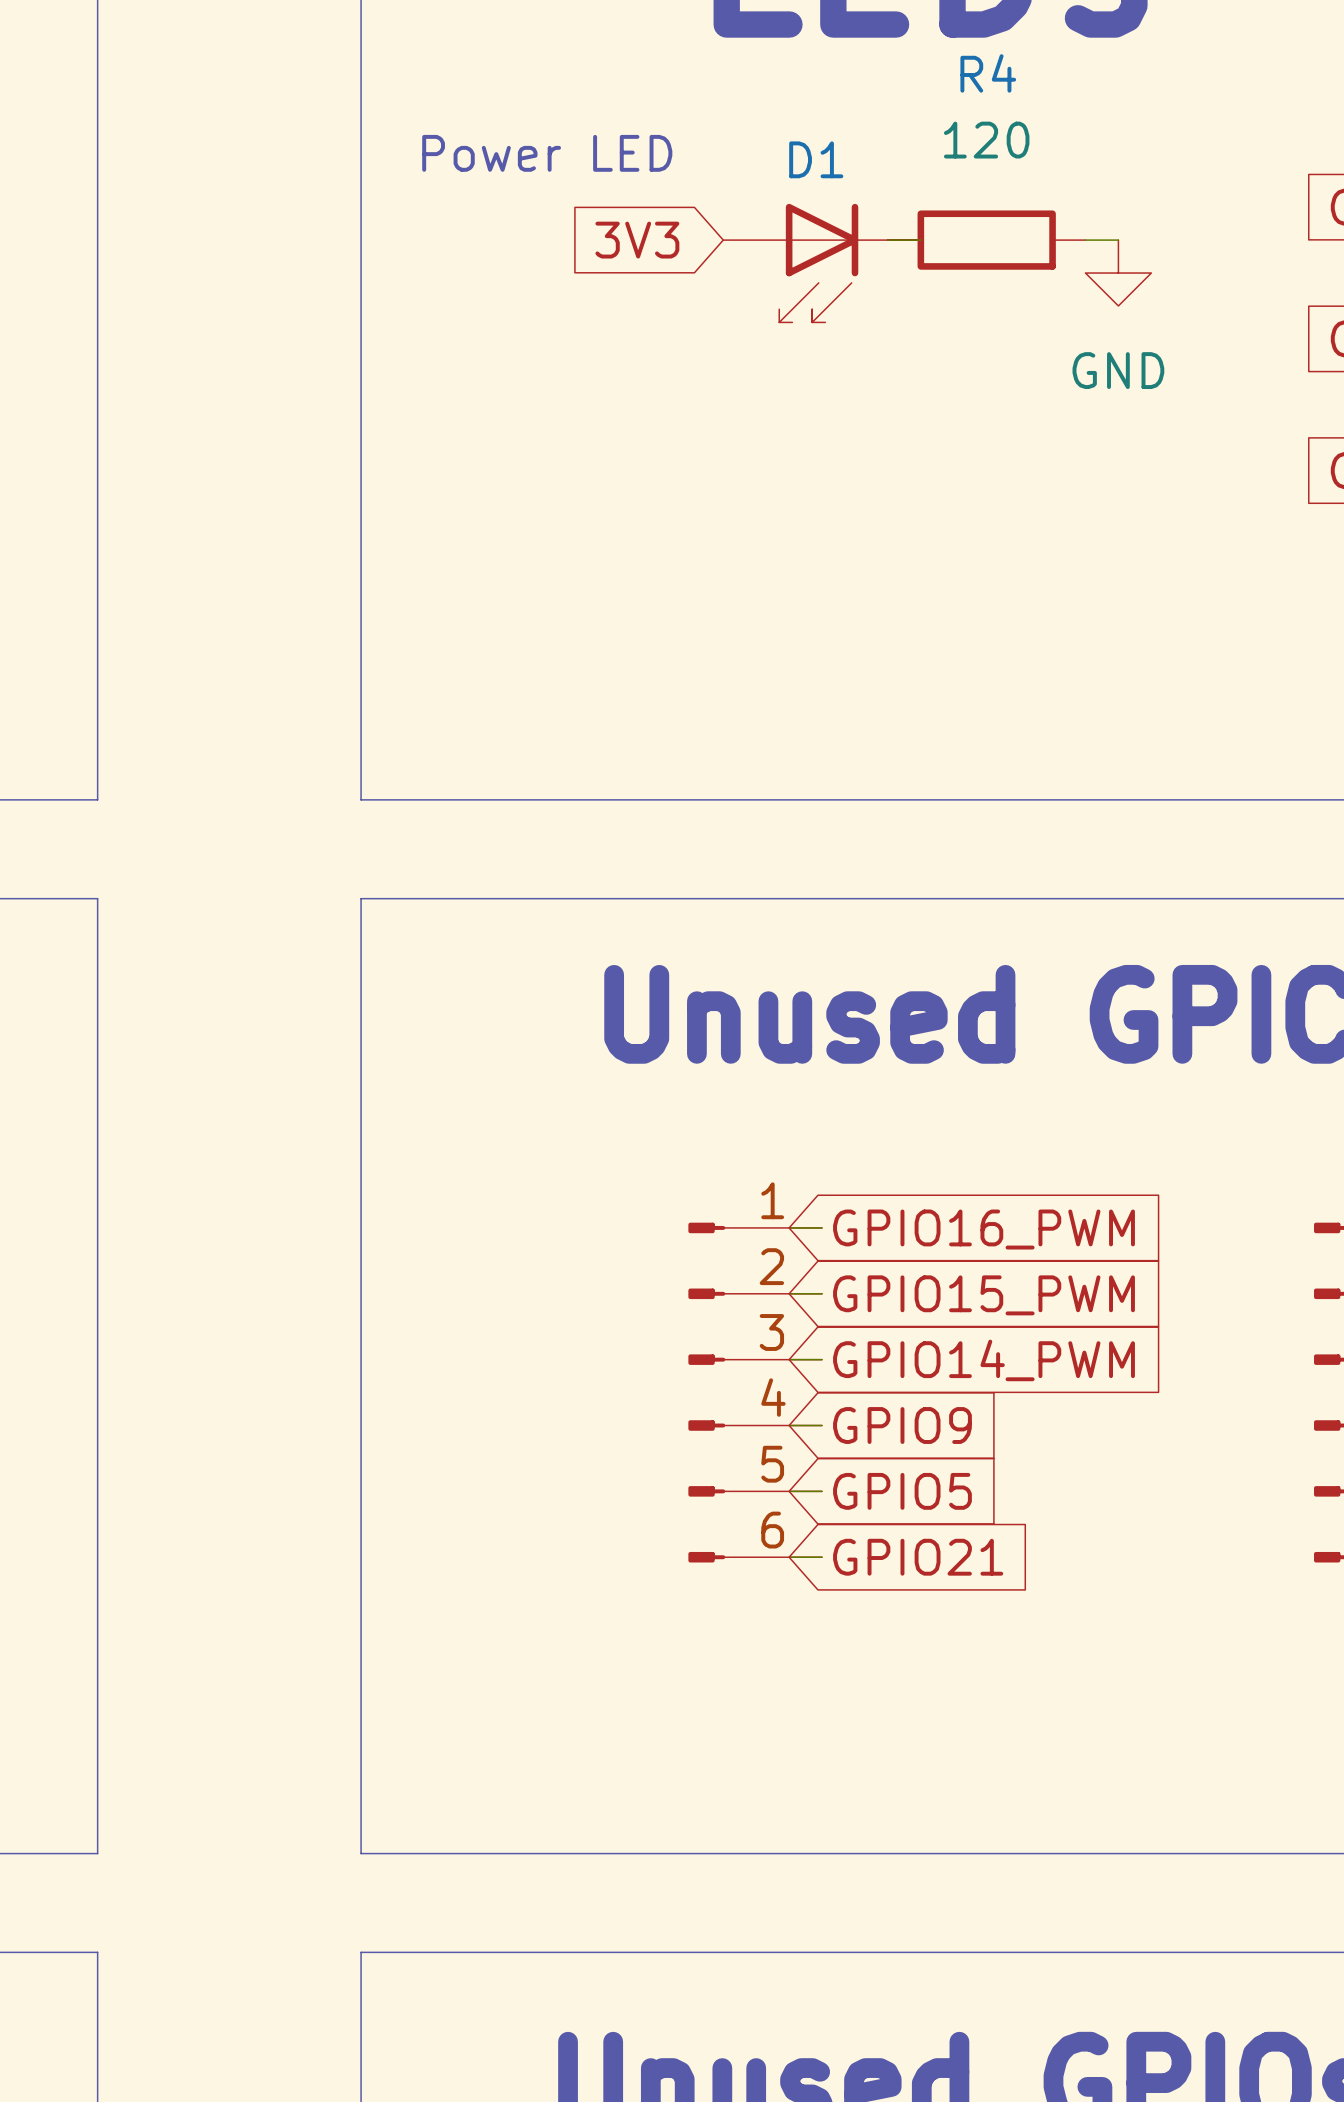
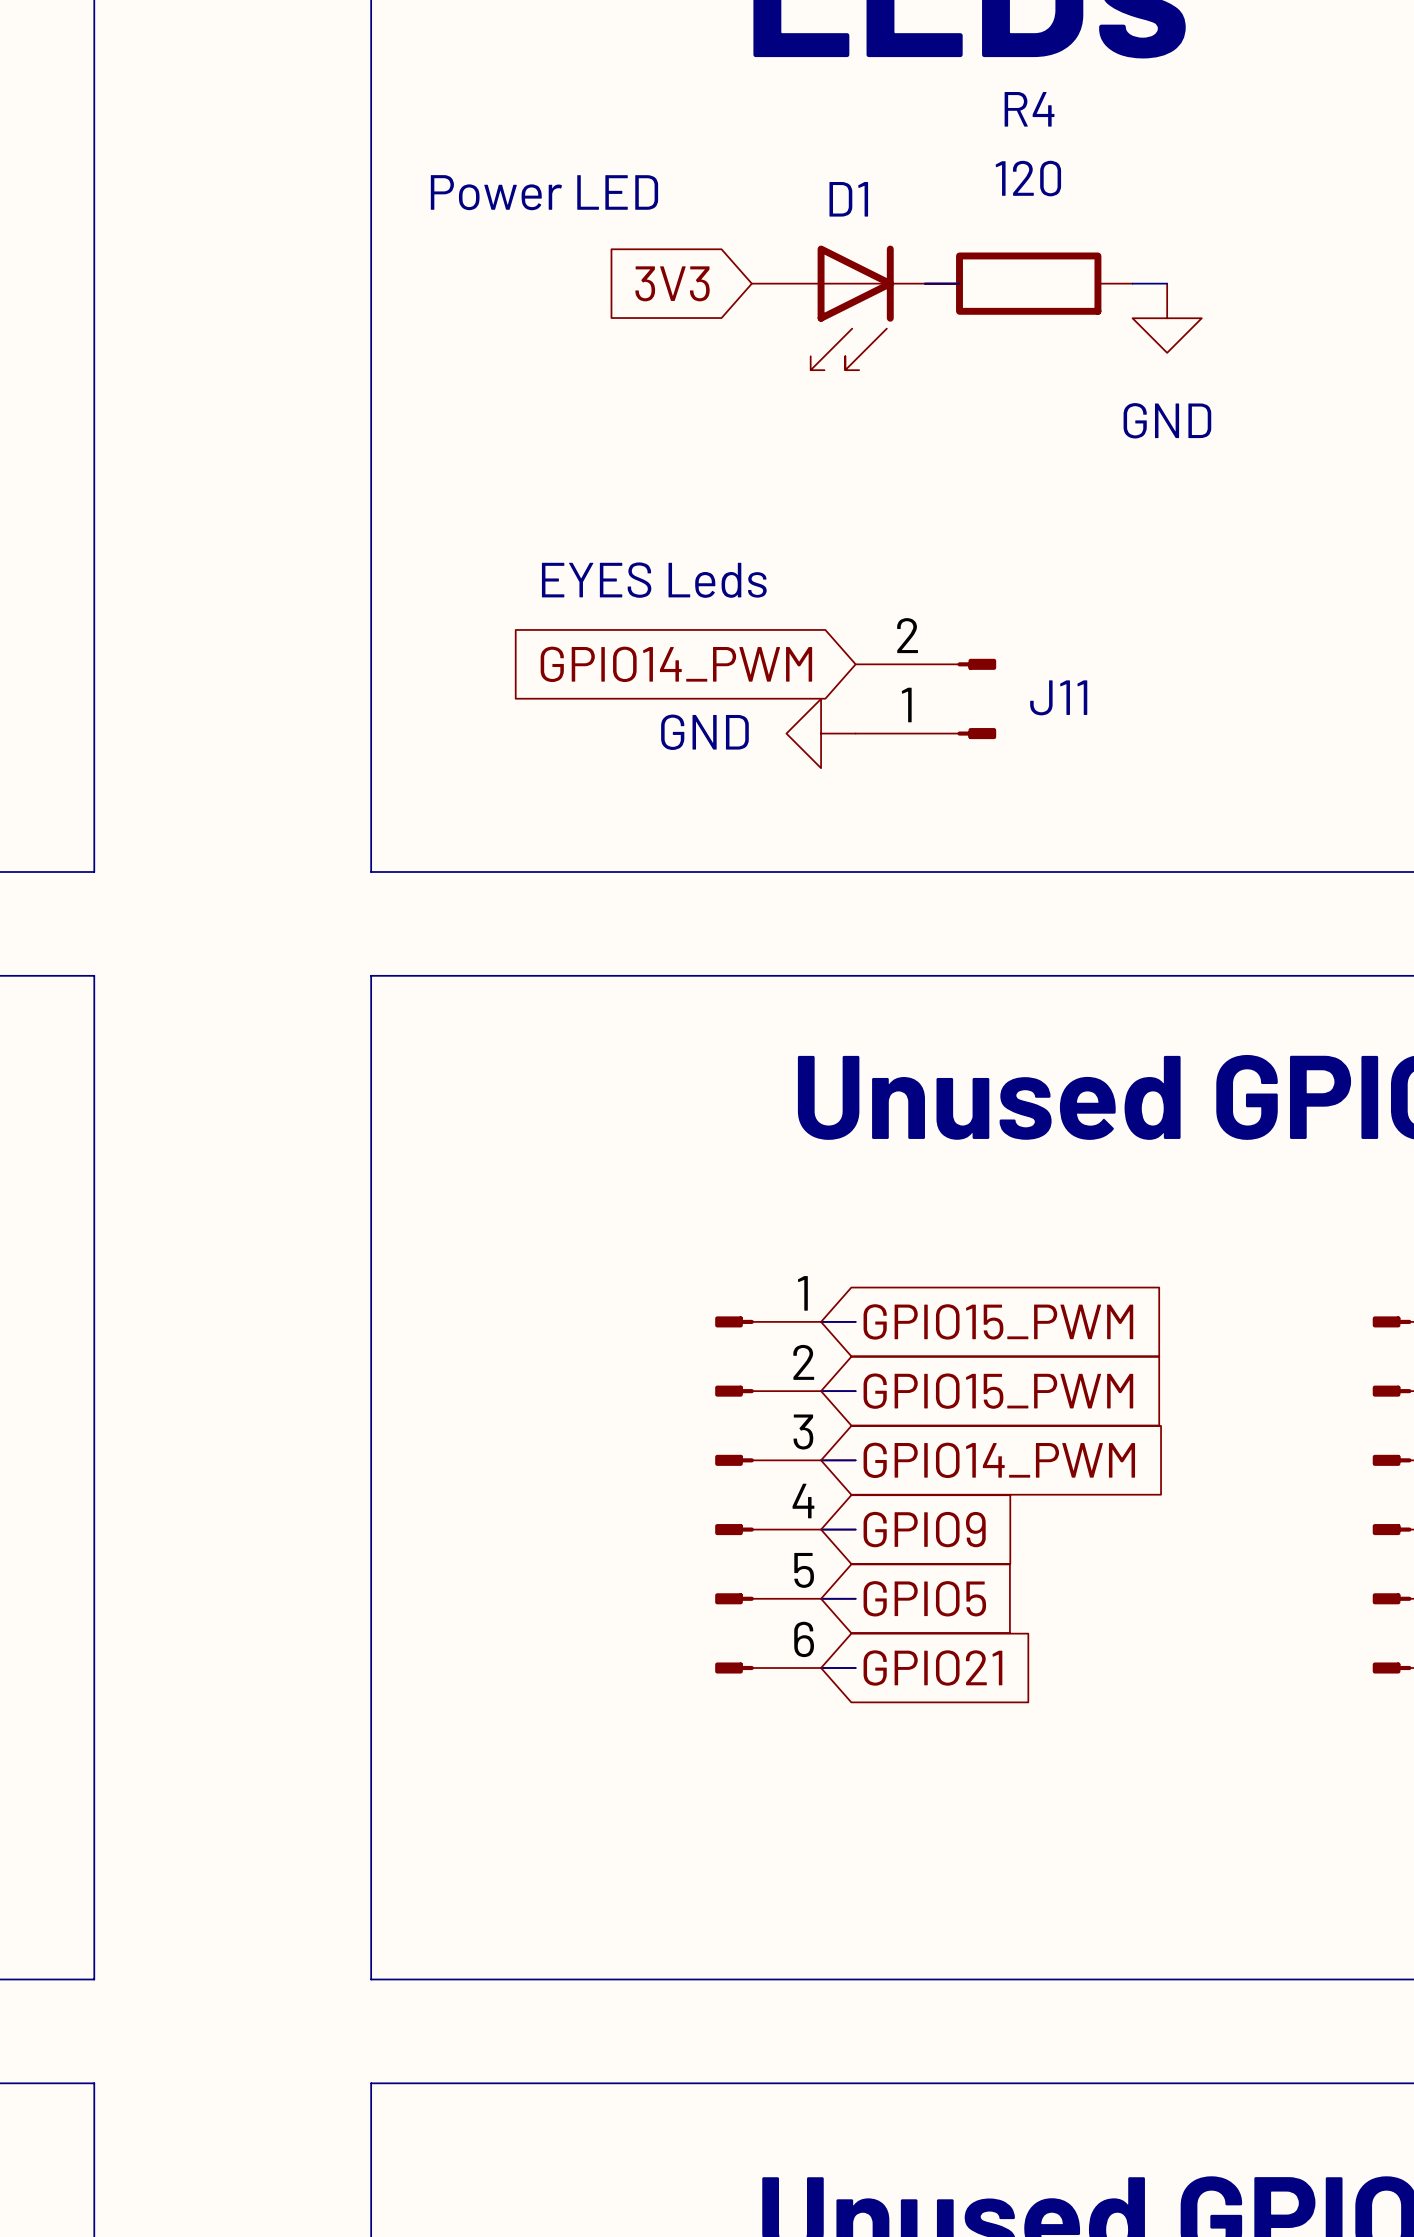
text: none -> EYES Leds (654, 580)
global label: none -> GPIO14_PWM (676, 664)
J11: none -> (925, 698)
power symbol: none -> GND (821, 733)
global label: GPIO16_PWM (984, 1229) -> GPIO15_PWM (998, 1321)

